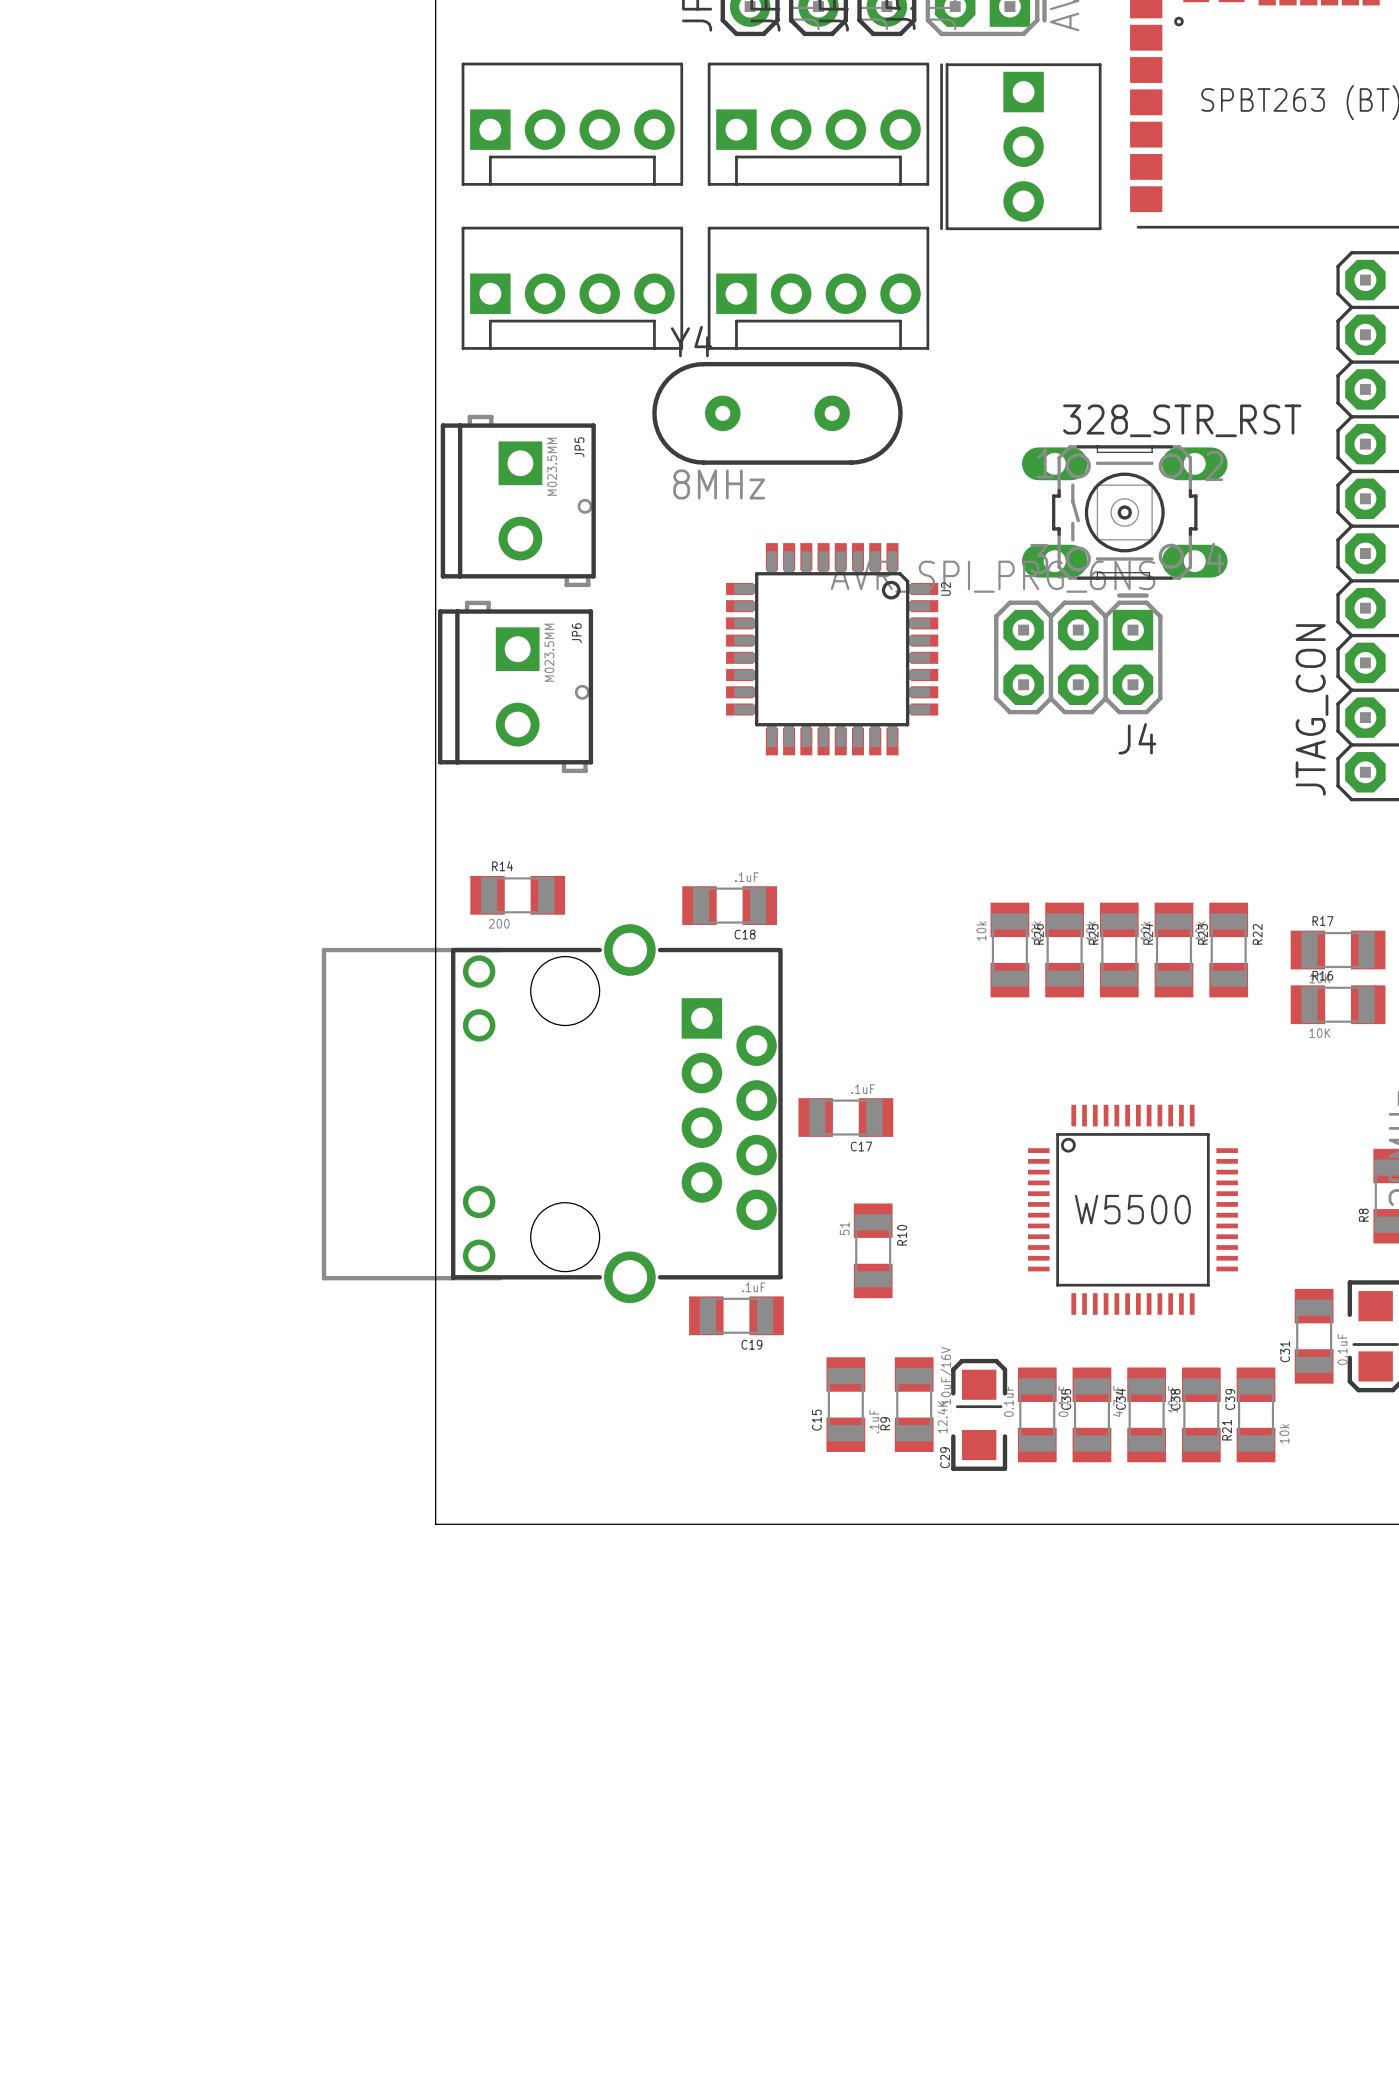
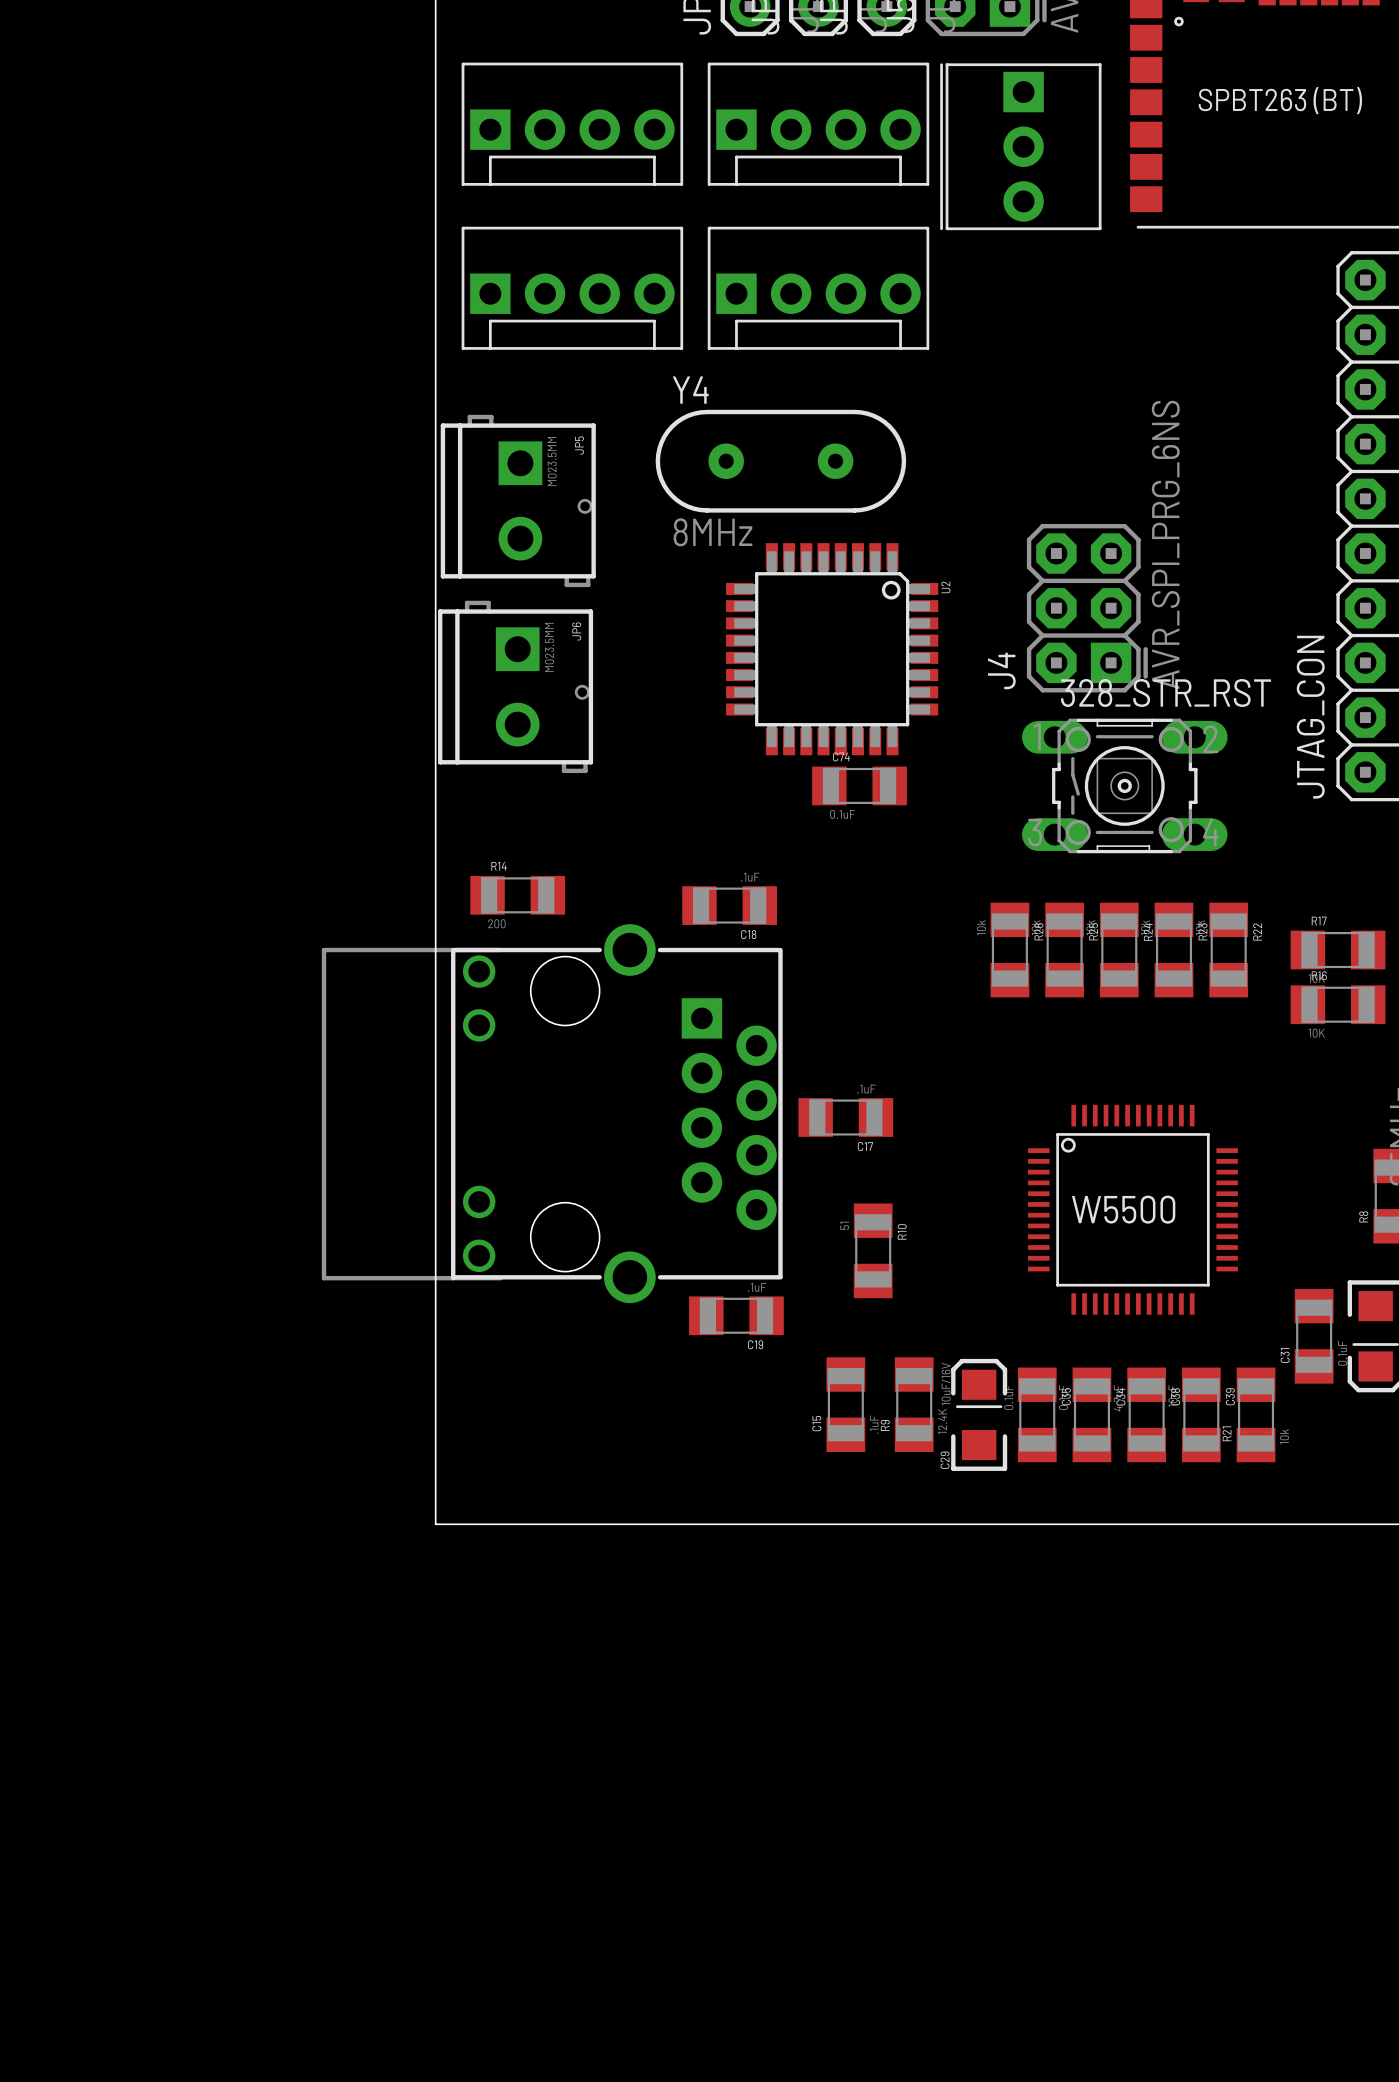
Y4 position: (777, 413) -> (780, 461)
328_STR_RST position: (1124, 512) -> (1124, 785)
J4 rotation: 0° (1078, 653) -> 90° clockwise (1087, 608)
C74: none -> 0.1uF (859, 785)

